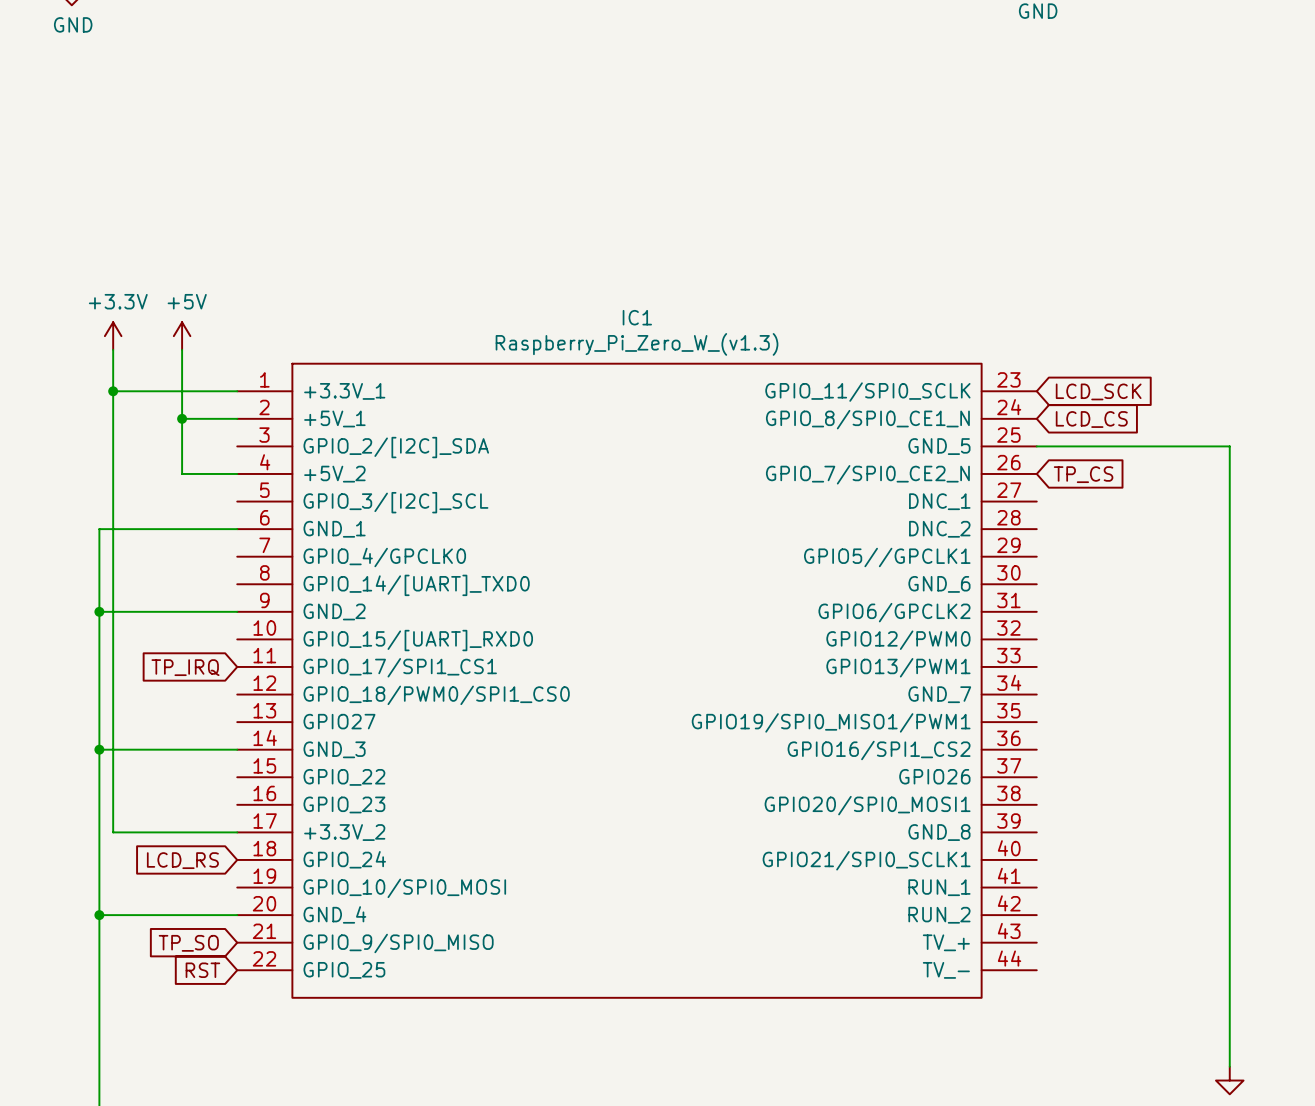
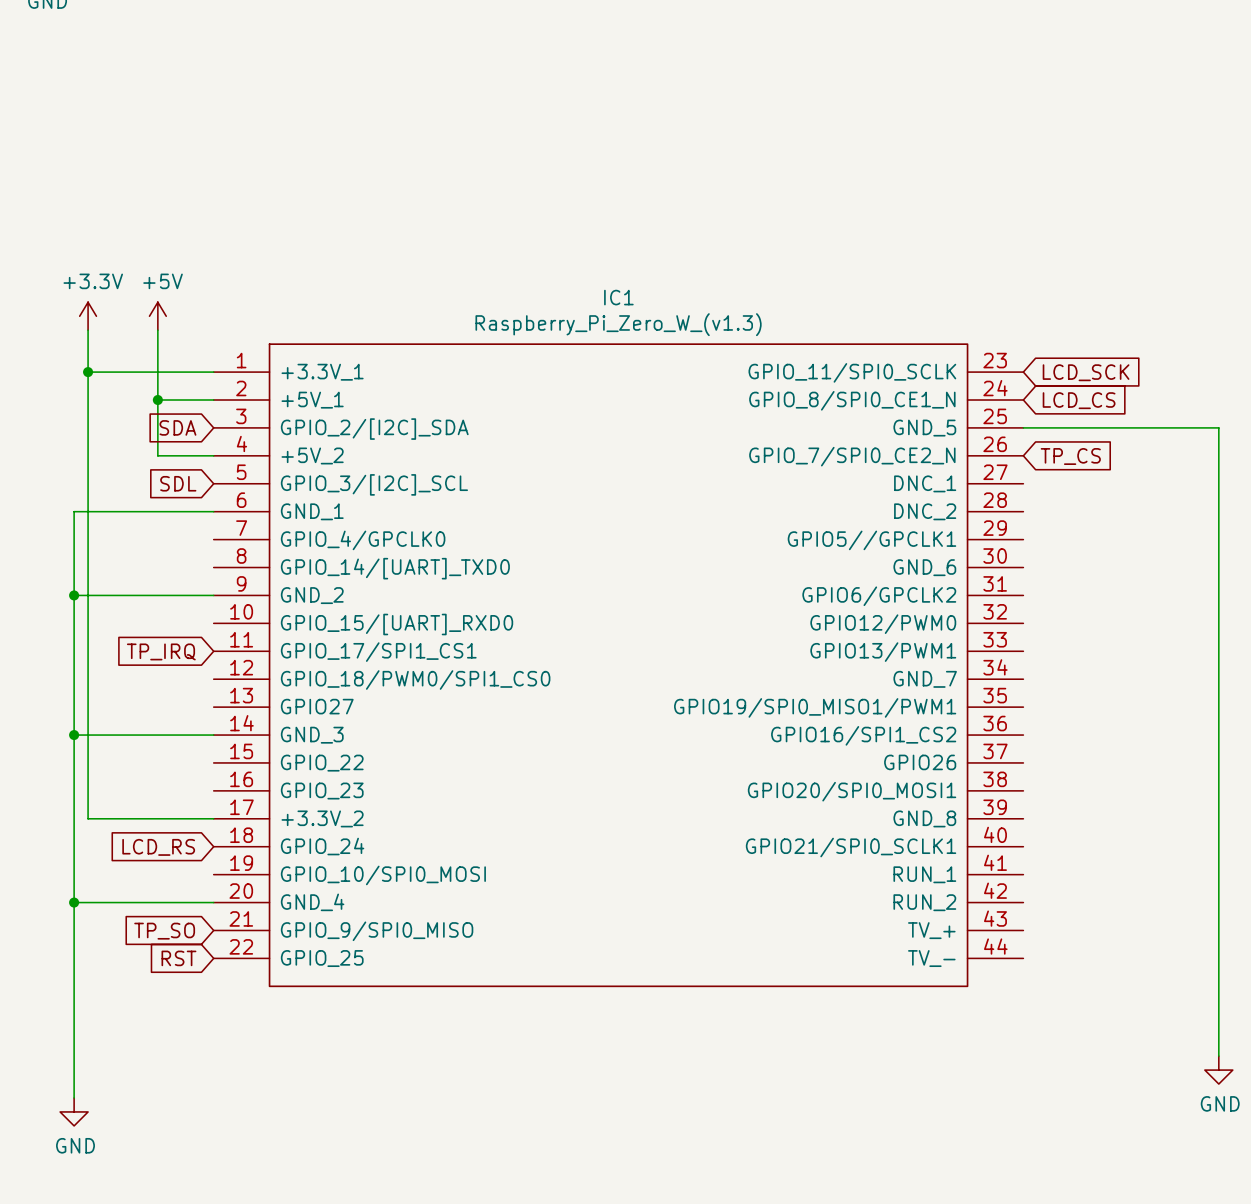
global label: none -> SDA (177, 427)
global label: none -> SDL (178, 483)

